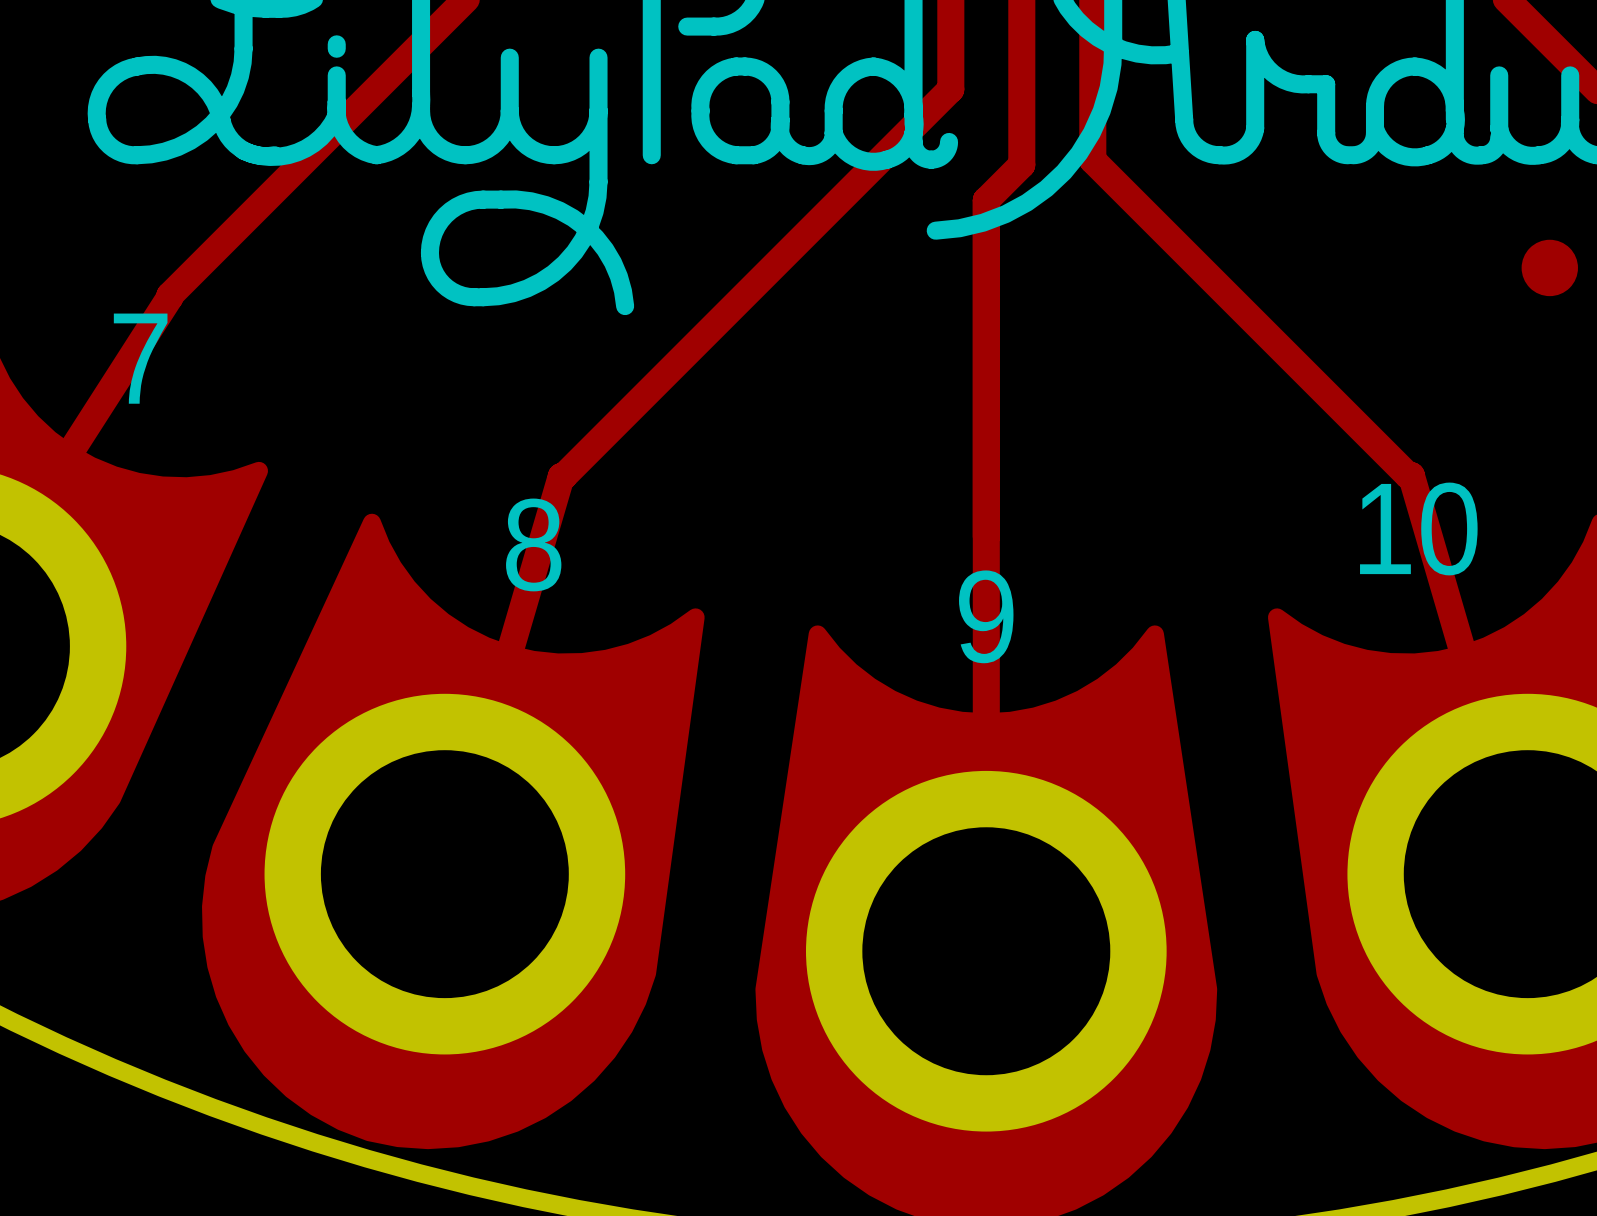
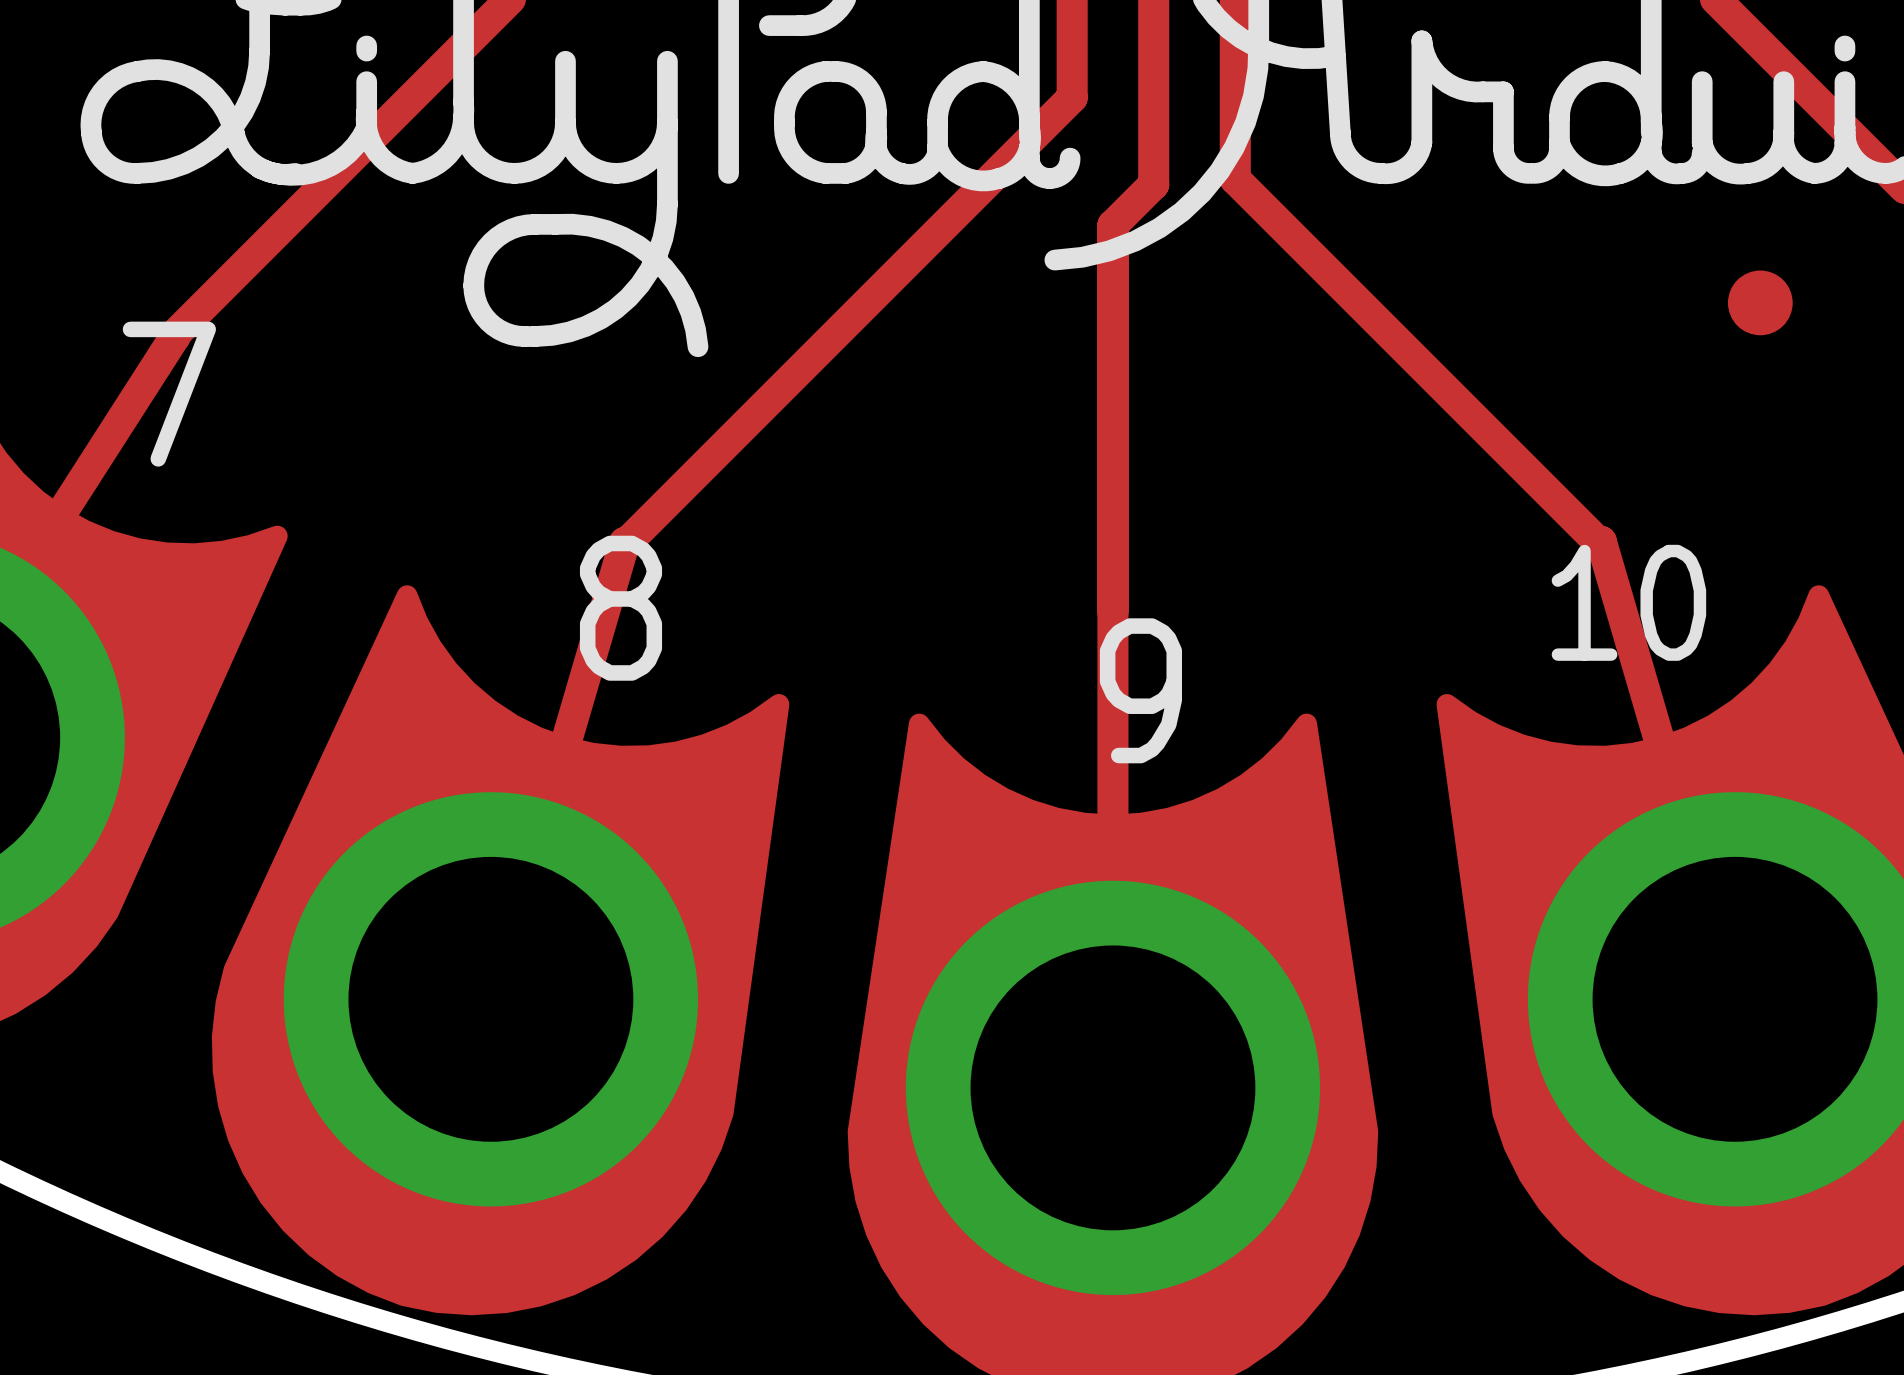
text position: 7 (140, 358) -> 7 (169, 394)
text position: 8 (533, 544) -> 8 (621, 608)
text position: 9 (986, 616) -> 9 (1140, 690)

